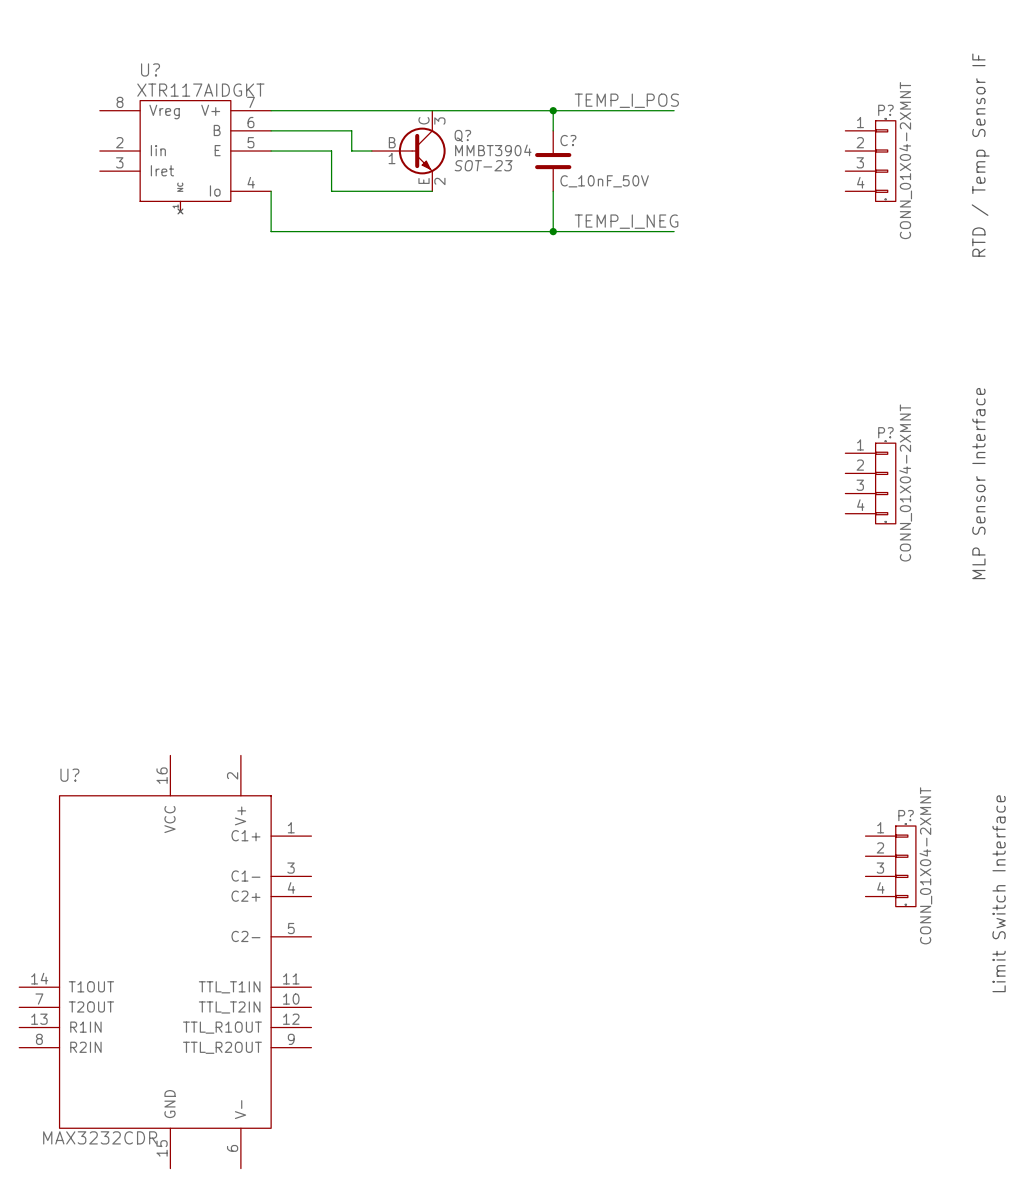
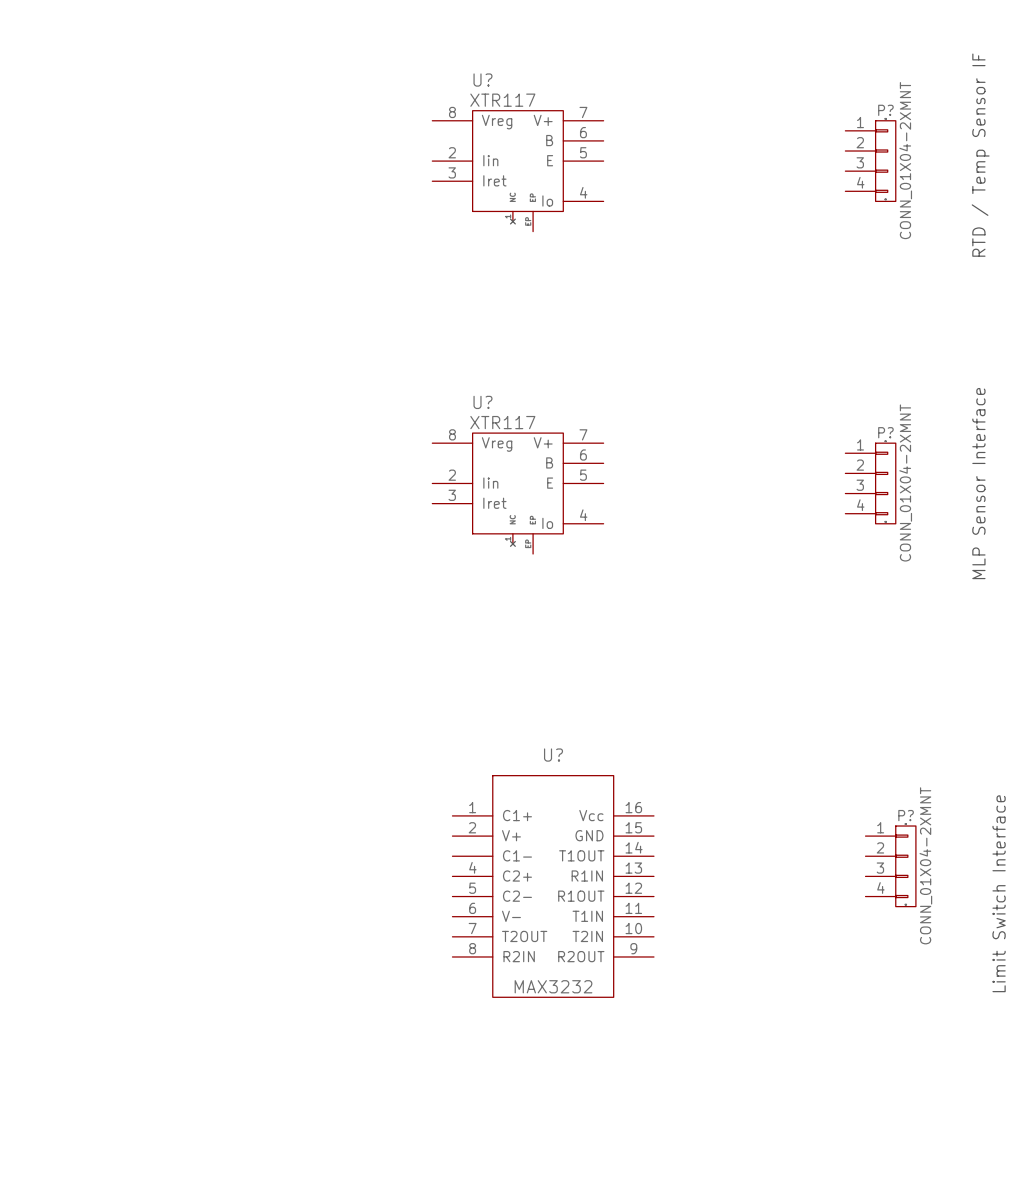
label: TEMP_I_POS (626, 100) -> none
wire: (271, 110) (674, 110) -> none
wire: (553, 110) (553, 130) -> none
junction: (553, 110) -> none
wire: (271, 130) (351, 130) (351, 151) (371, 151) -> none
wire: (271, 151) (331, 151) (331, 191) (432, 191) -> none
Q?: MMBT3904 (408, 151) -> none
U?: XTR117AIDGKT (185, 157) -> none
C?: C_10nF_50V (553, 161) -> none
U?: none -> XTR117 (517, 171)
wire: (271, 191) (271, 231) (674, 231) -> none
wire: (553, 191) (553, 231) -> none
label: TEMP_I_NEG (626, 221) -> none
junction: (553, 231) -> none
U?: none -> XTR117 (517, 493)
U?: none -> MAX3232 (553, 886)
U?: MAX3232CDR (165, 962) -> none

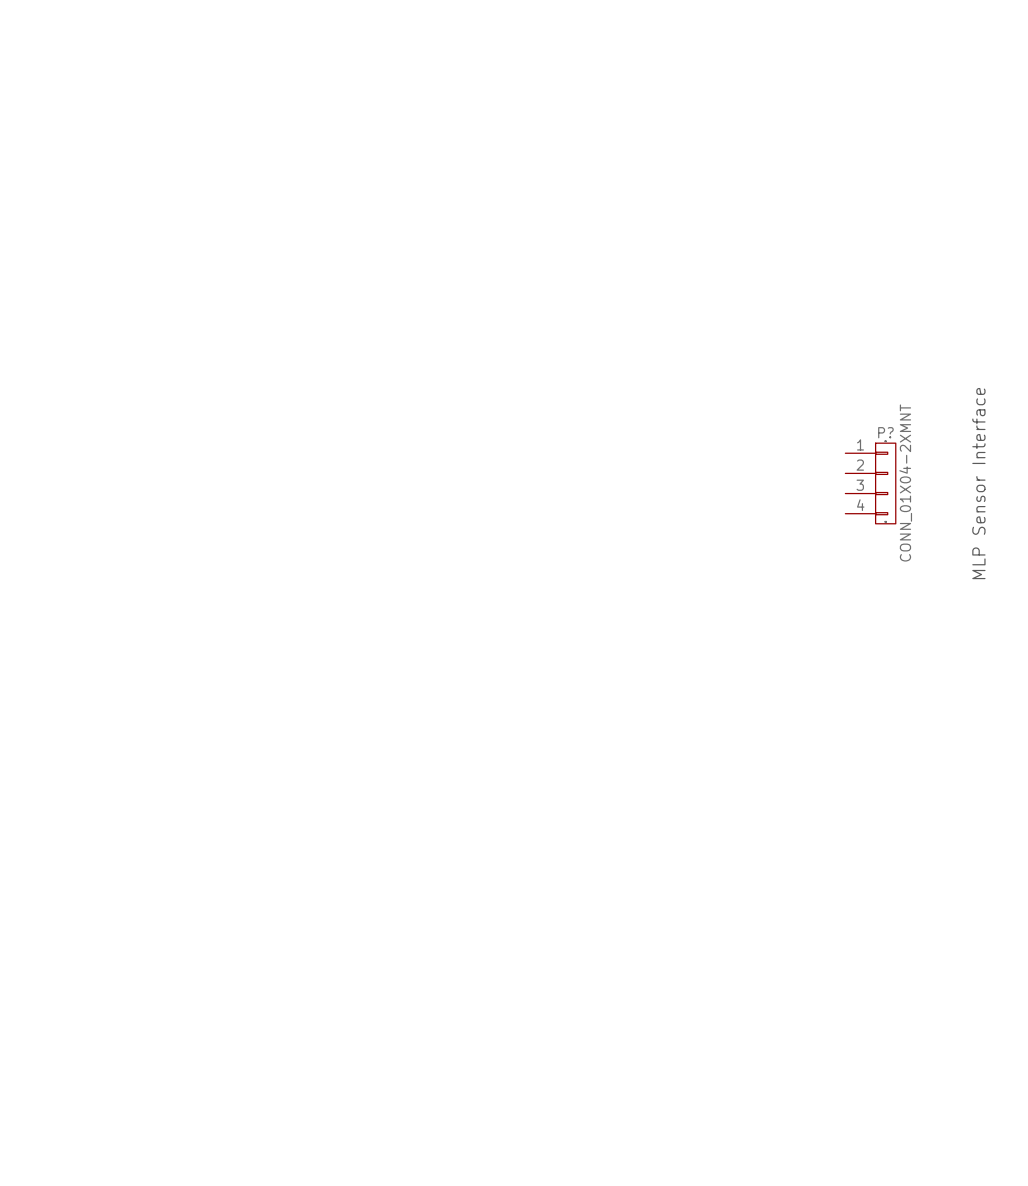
text: RTD / Temp Sensor IF (980, 155) -> none
P?: CONN_01X04-2XMNT (870, 161) -> none
U?: XTR117 (517, 171) -> none
U?: XTR117 (517, 493) -> none
P?: CONN_01X04-2XMNT (890, 866) -> none
U?: MAX3232 (553, 886) -> none
text: Limit Switch Interface (999, 893) -> none

